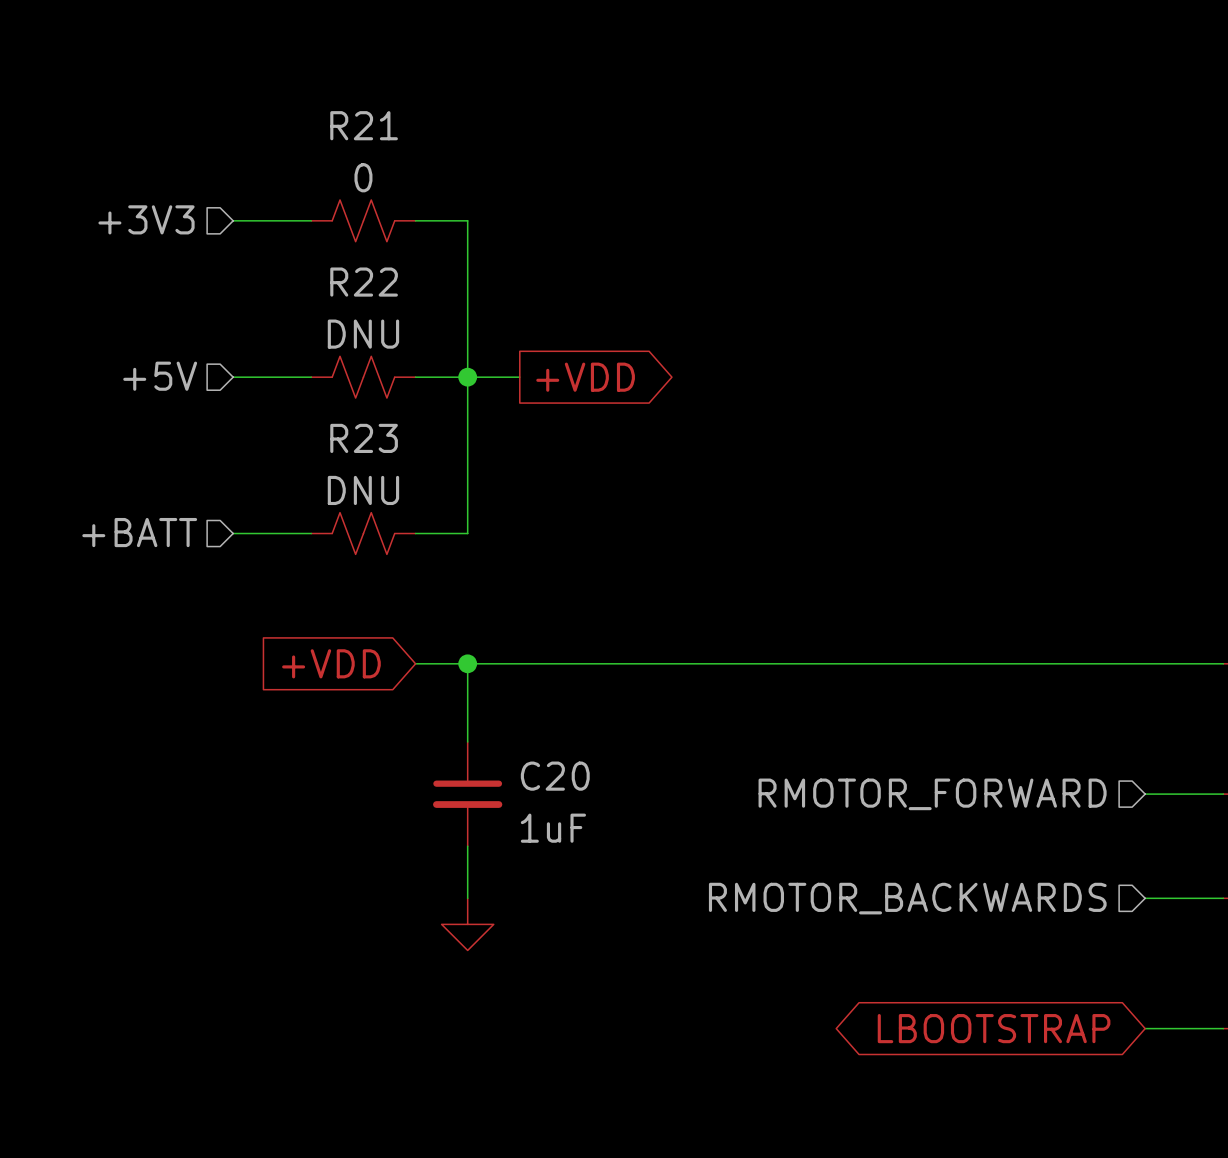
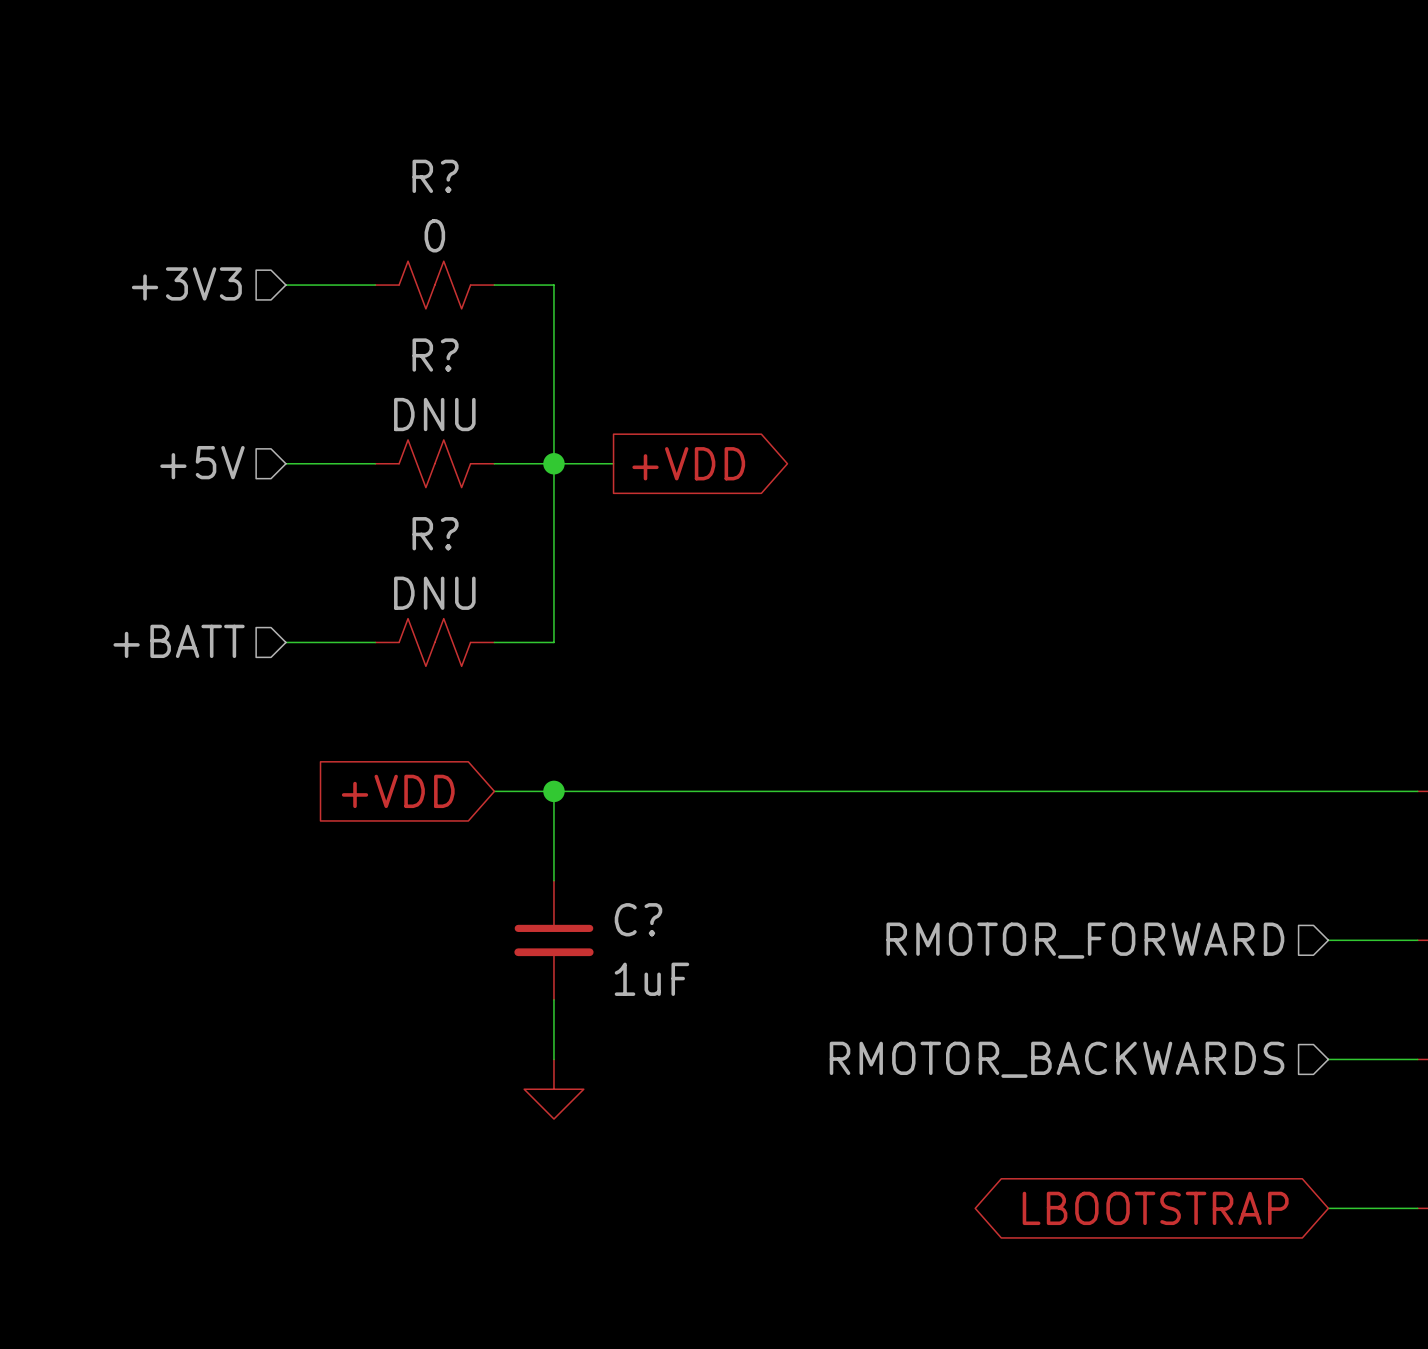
R21 name: R21 (364, 125) -> R? (435, 176)
R22 name: R22 (364, 282) -> R? (435, 355)
R23 name: R23 (364, 438) -> R? (435, 533)
C20 name: C20 (555, 776) -> C? (638, 919)

